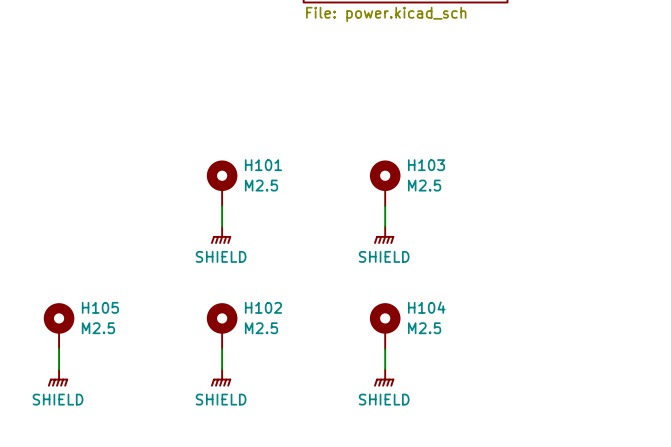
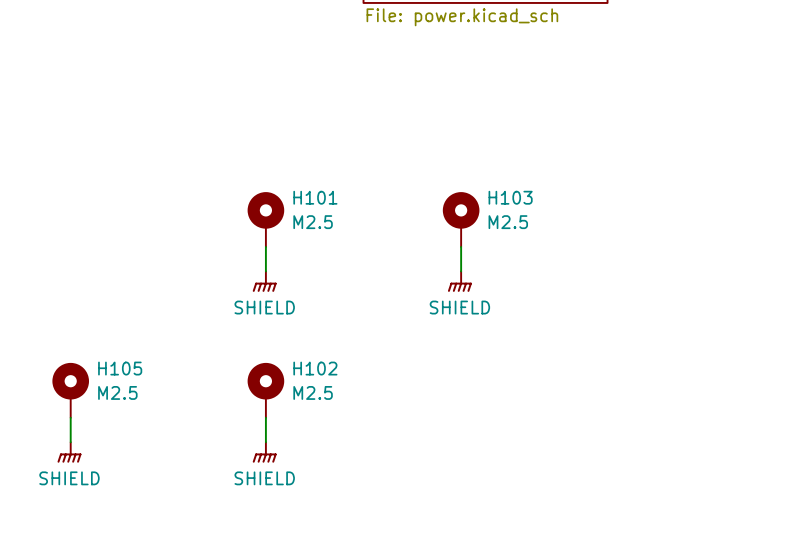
H104: M2.5 (385, 326) -> none
wire: (385, 349) (385, 369) -> none
power symbol: SHIELD (384, 377) -> none

